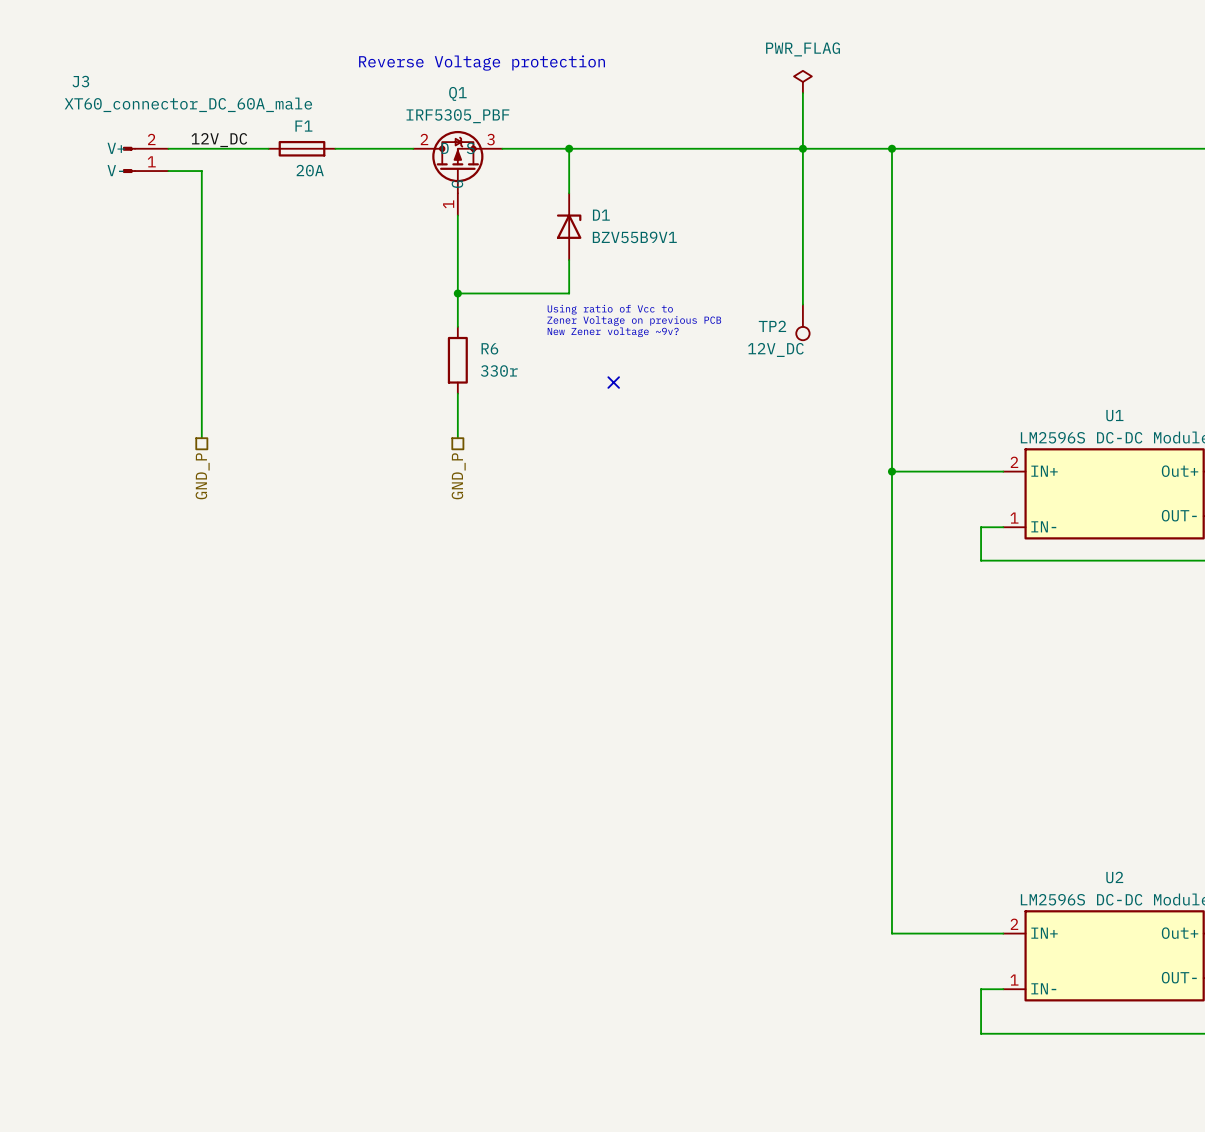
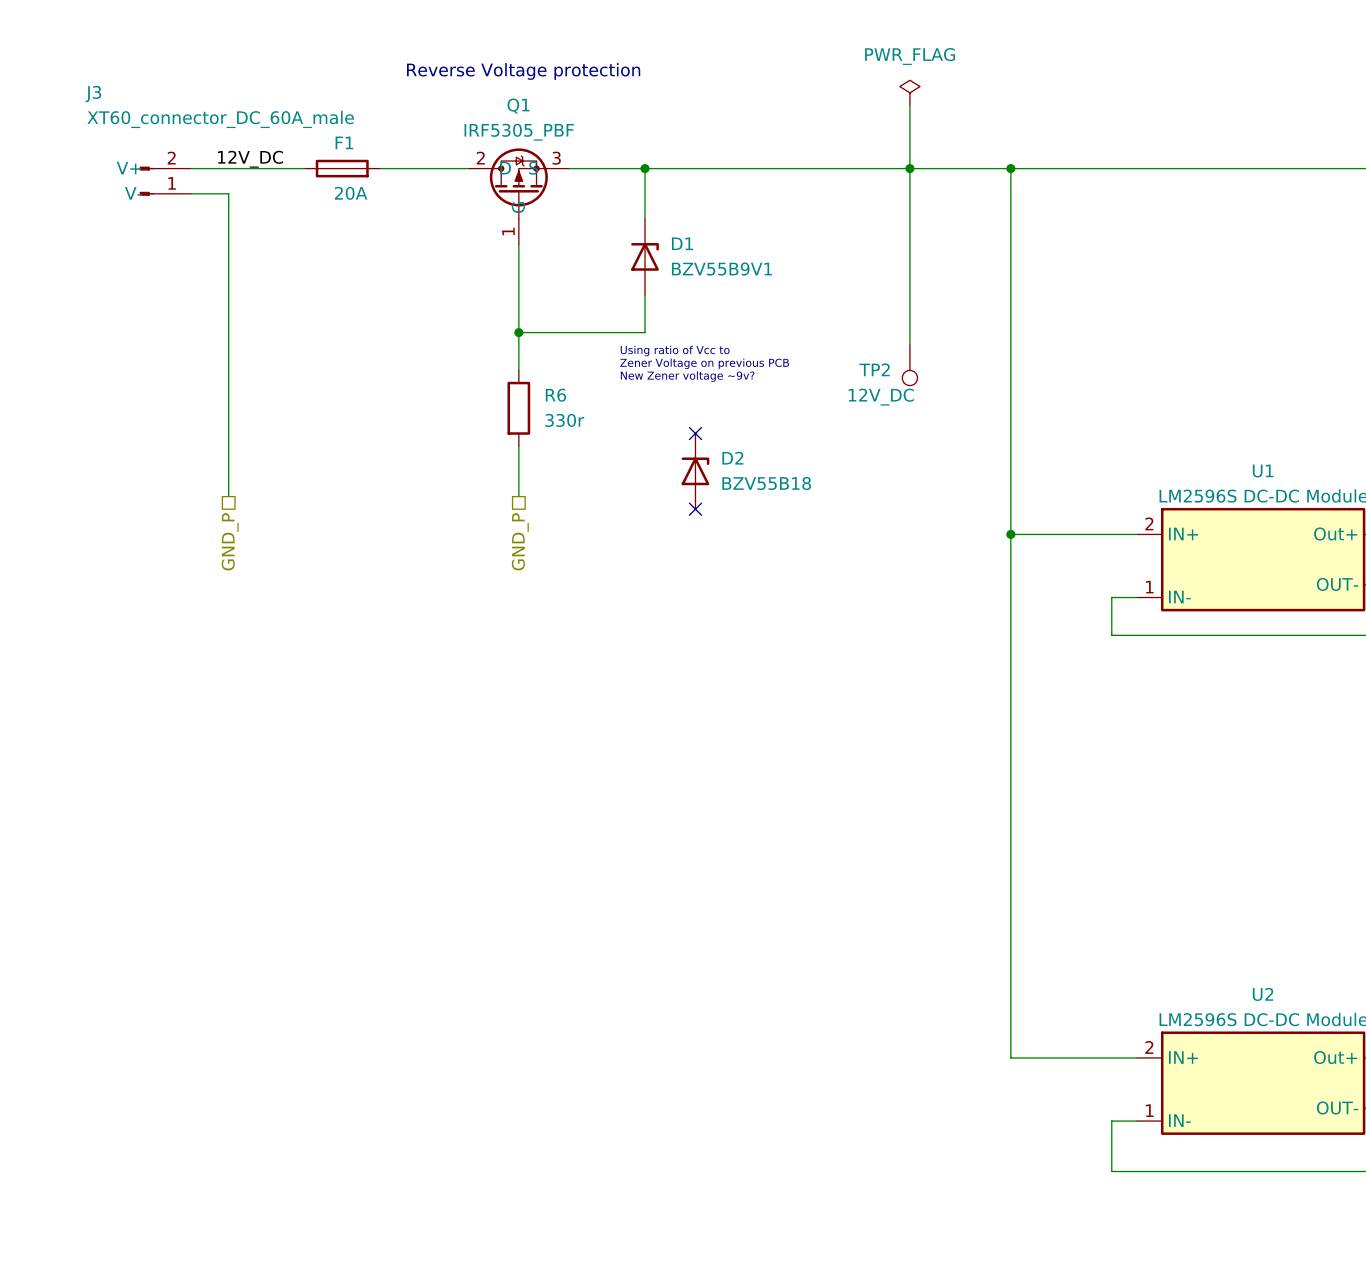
D2: none -> BZV55B18 (695, 471)
no-connect mark: none -> (695, 509)

